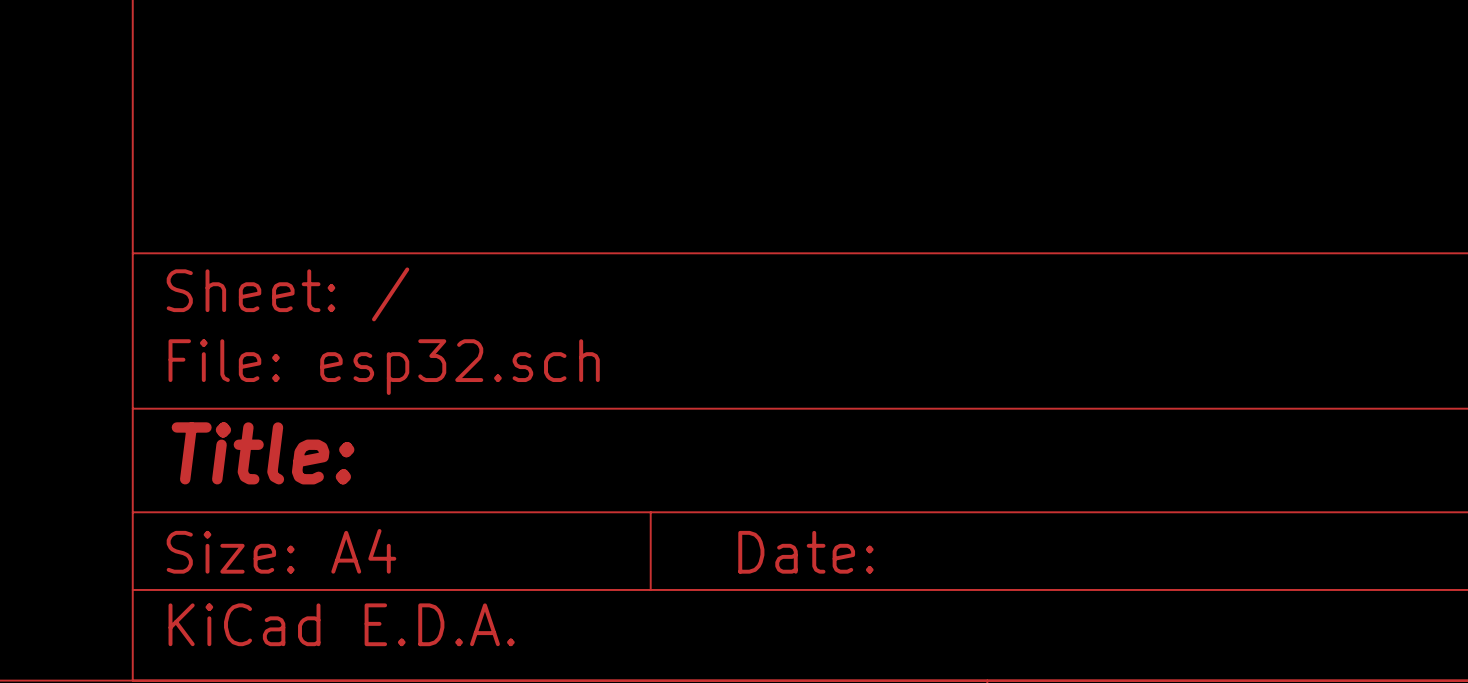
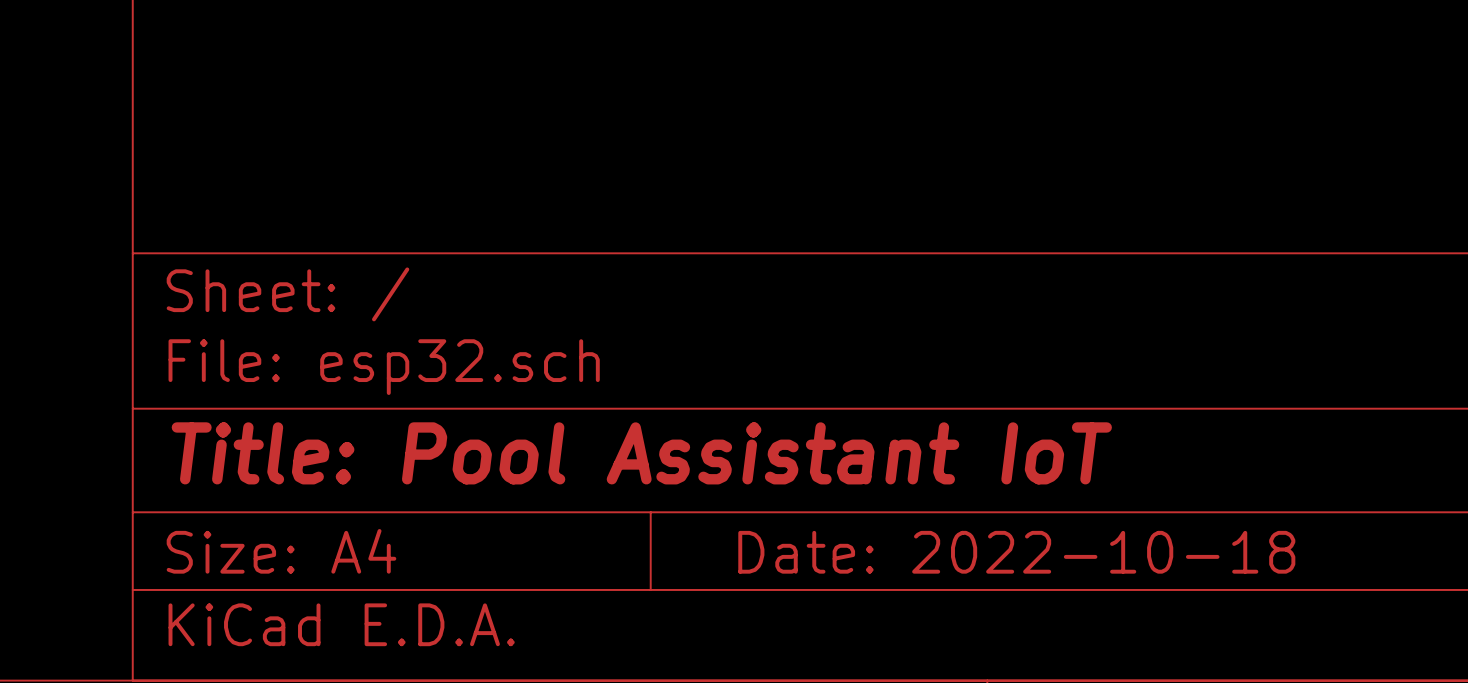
title block: Title: (263, 453) -> Title: Pool Assistant IoT (641, 453)
title block: Date: (805, 552) -> Date: 2022-10-18 (1016, 552)

